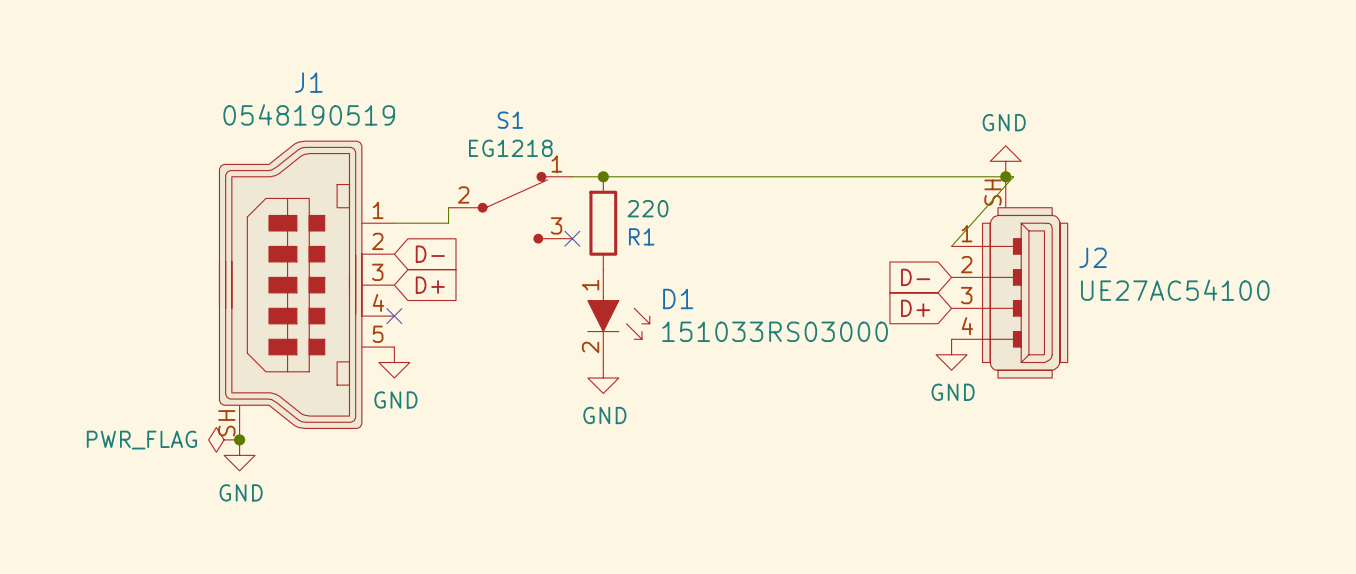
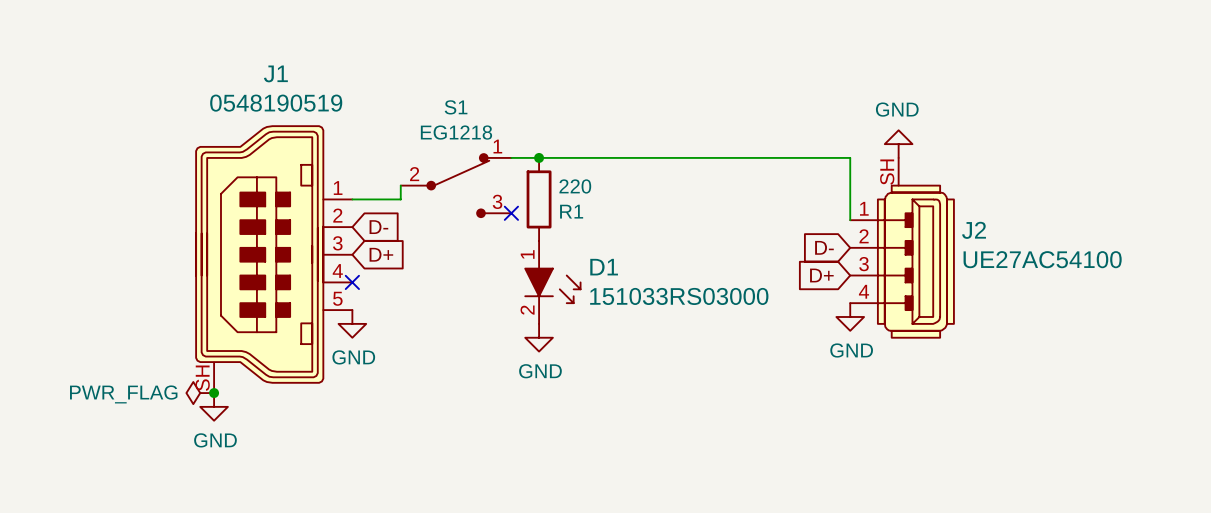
wire: (951, 176) (1013, 176) (951, 246) -> (850, 157) (850, 220)
junction: (1005, 176) -> none

